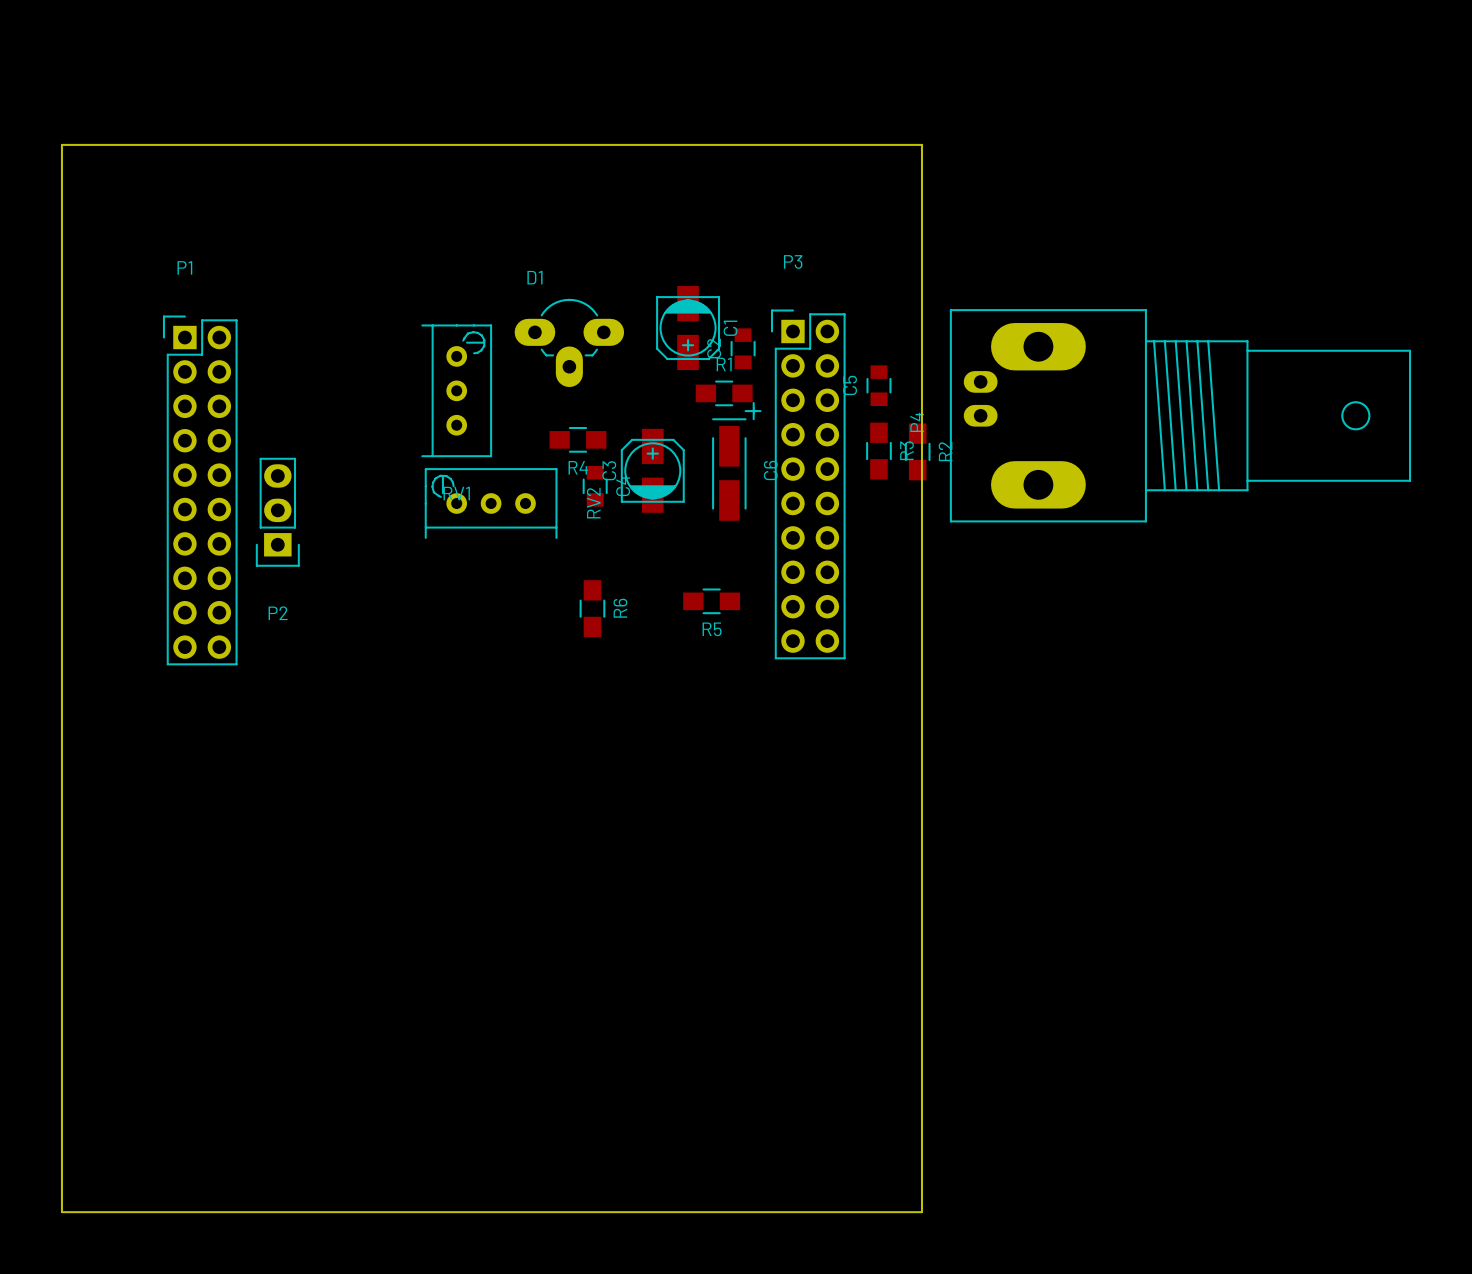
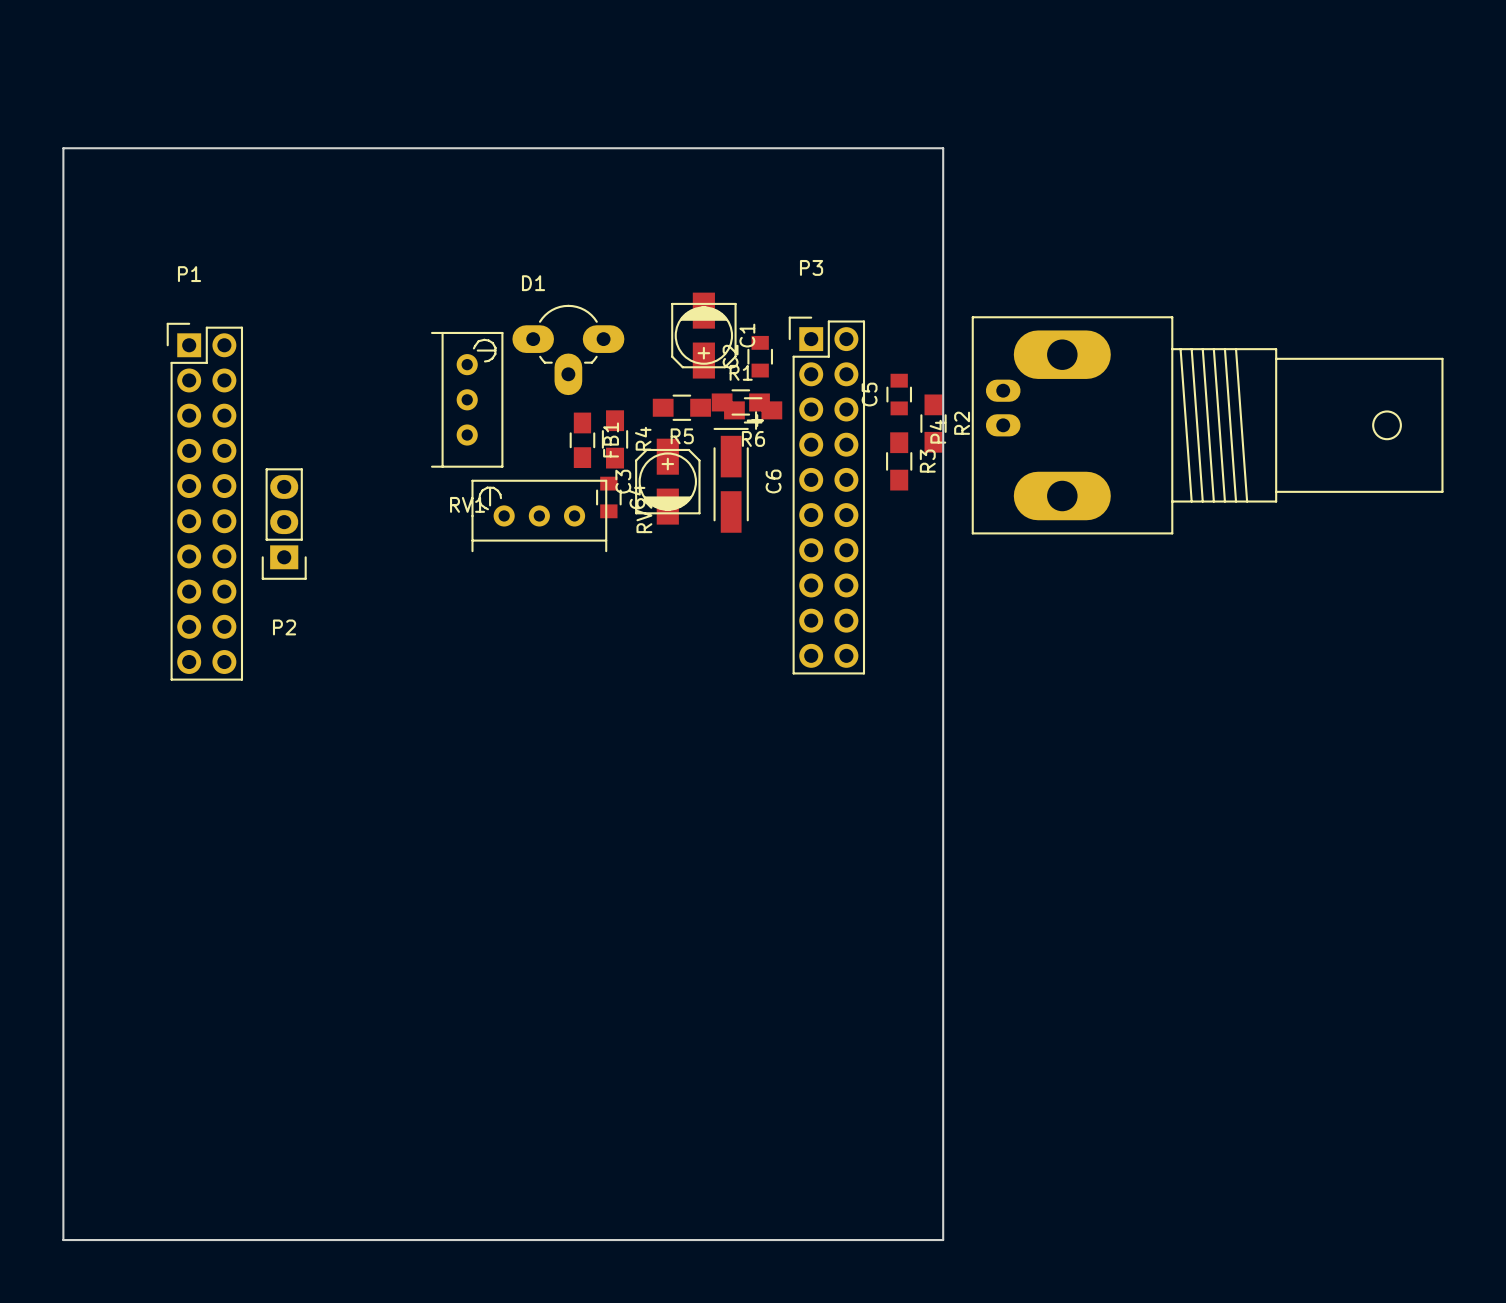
D1 position: (569, 342) -> (568, 349)
FB1: none -> (582, 440)
R4 rotation: 0° (577, 439) -> 90° clockwise (615, 439)
R2 position: (917, 451) -> (933, 423)
C6 position: (736, 461) -> (738, 471)
R4 name position: R4 (578, 467) -> R4 (643, 438)
RV2 position: (491, 503) -> (539, 515)
R5 position: (711, 601) -> (681, 407)
R6 rotation: 0° (592, 608) -> 90° clockwise (753, 410)
R6 position: (592, 608) -> (753, 410)

